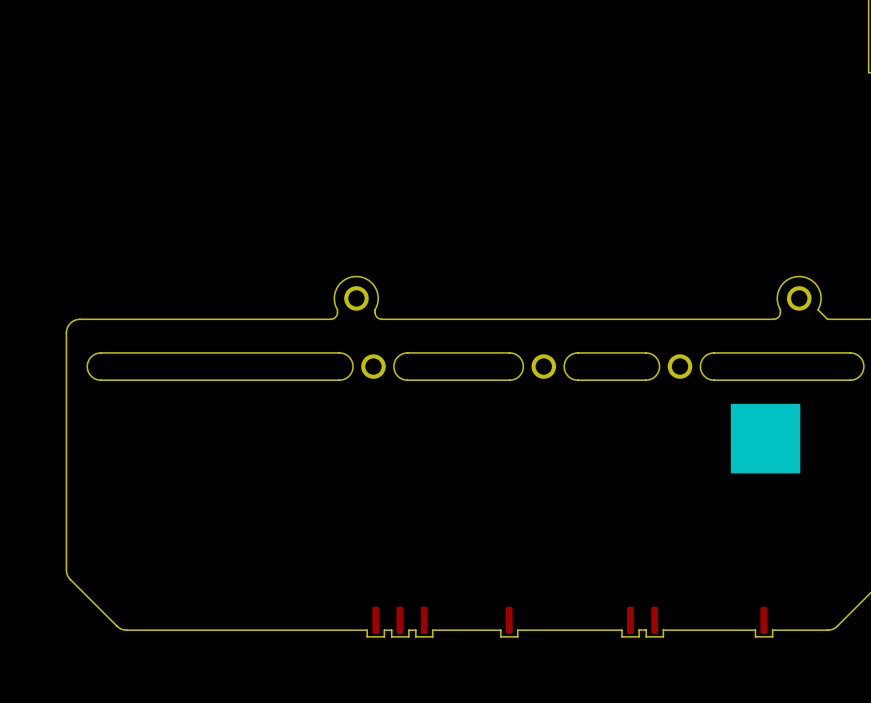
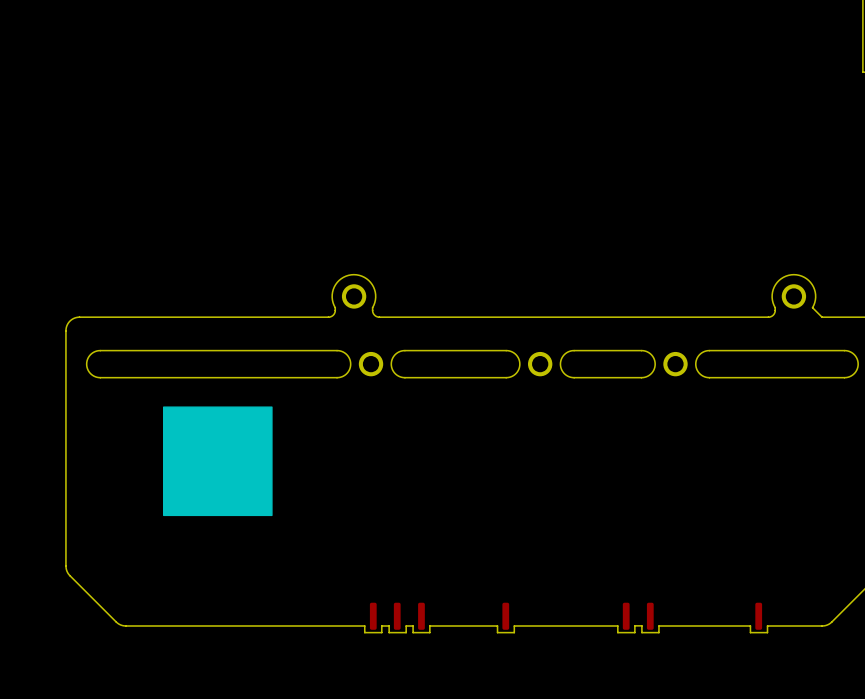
drawing: [730, 403, 801, 474] -> none
drawing: none -> [162, 406, 273, 517]

